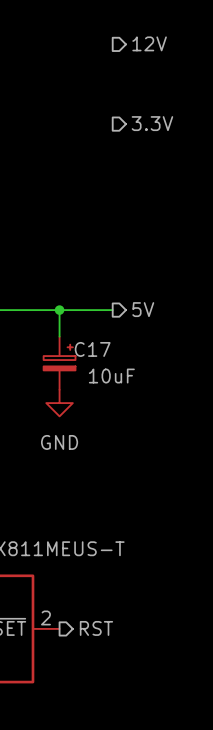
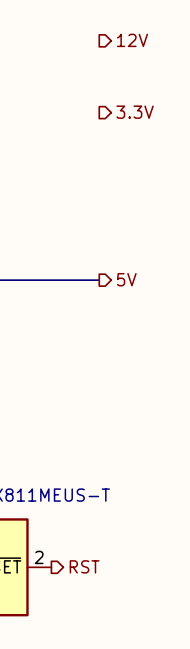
wire: (59, 310) (59, 336) -> none
junction: (59, 310) -> none
C17: 10uF (59, 363) -> none
power symbol: GND (59, 403) -> none

